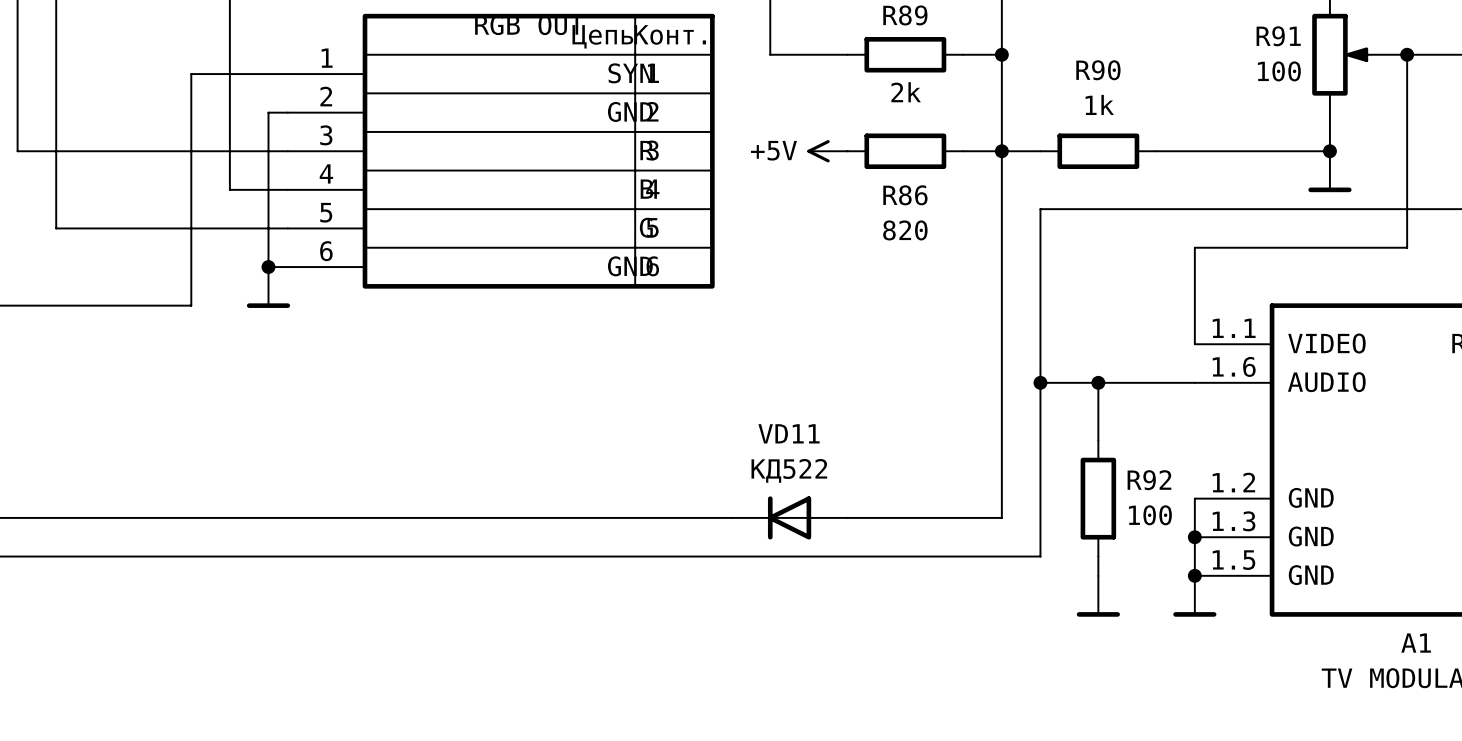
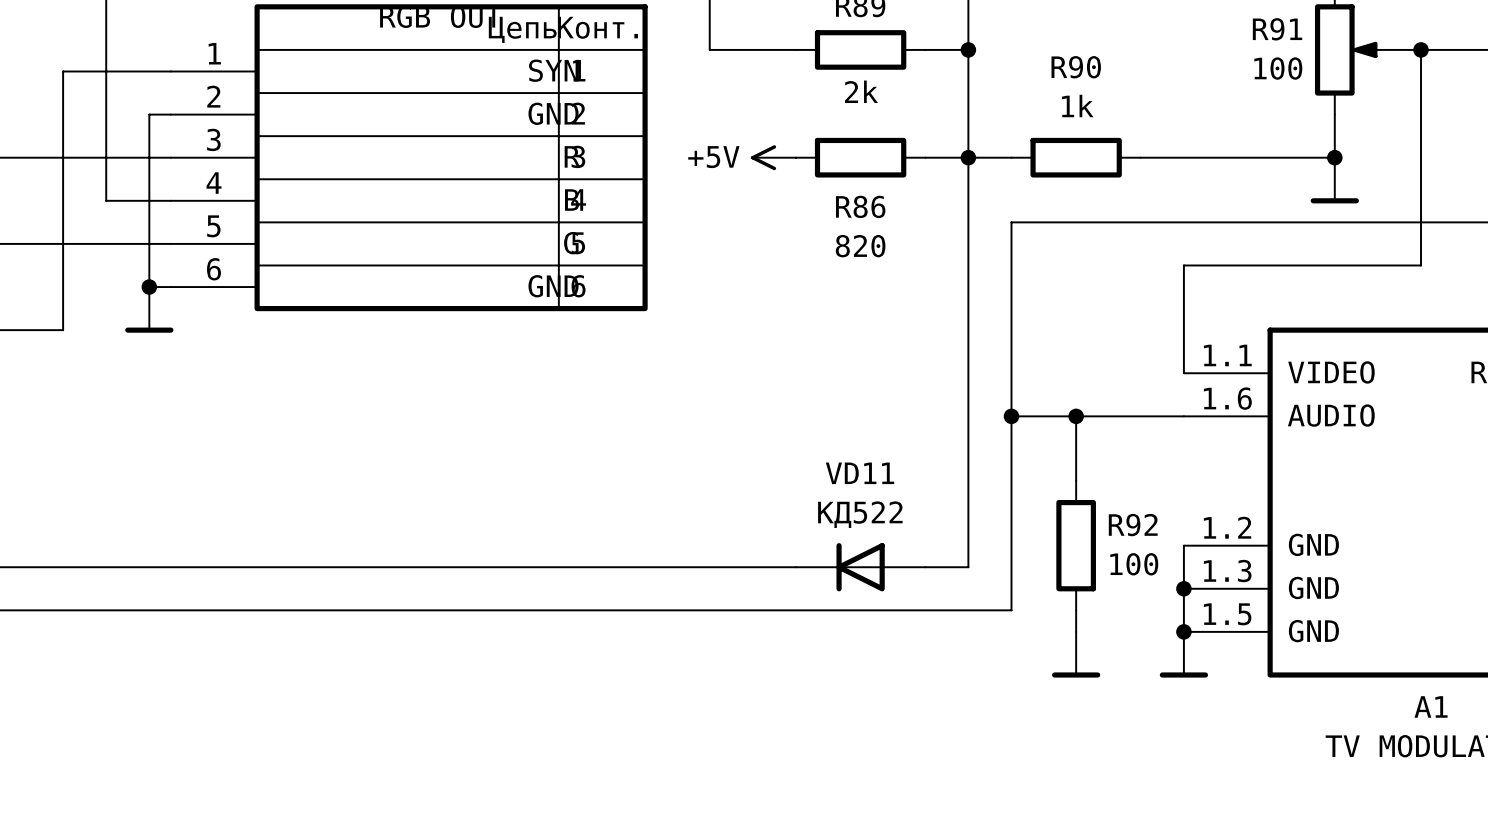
VD11 position: (789, 517) -> (860, 567)

